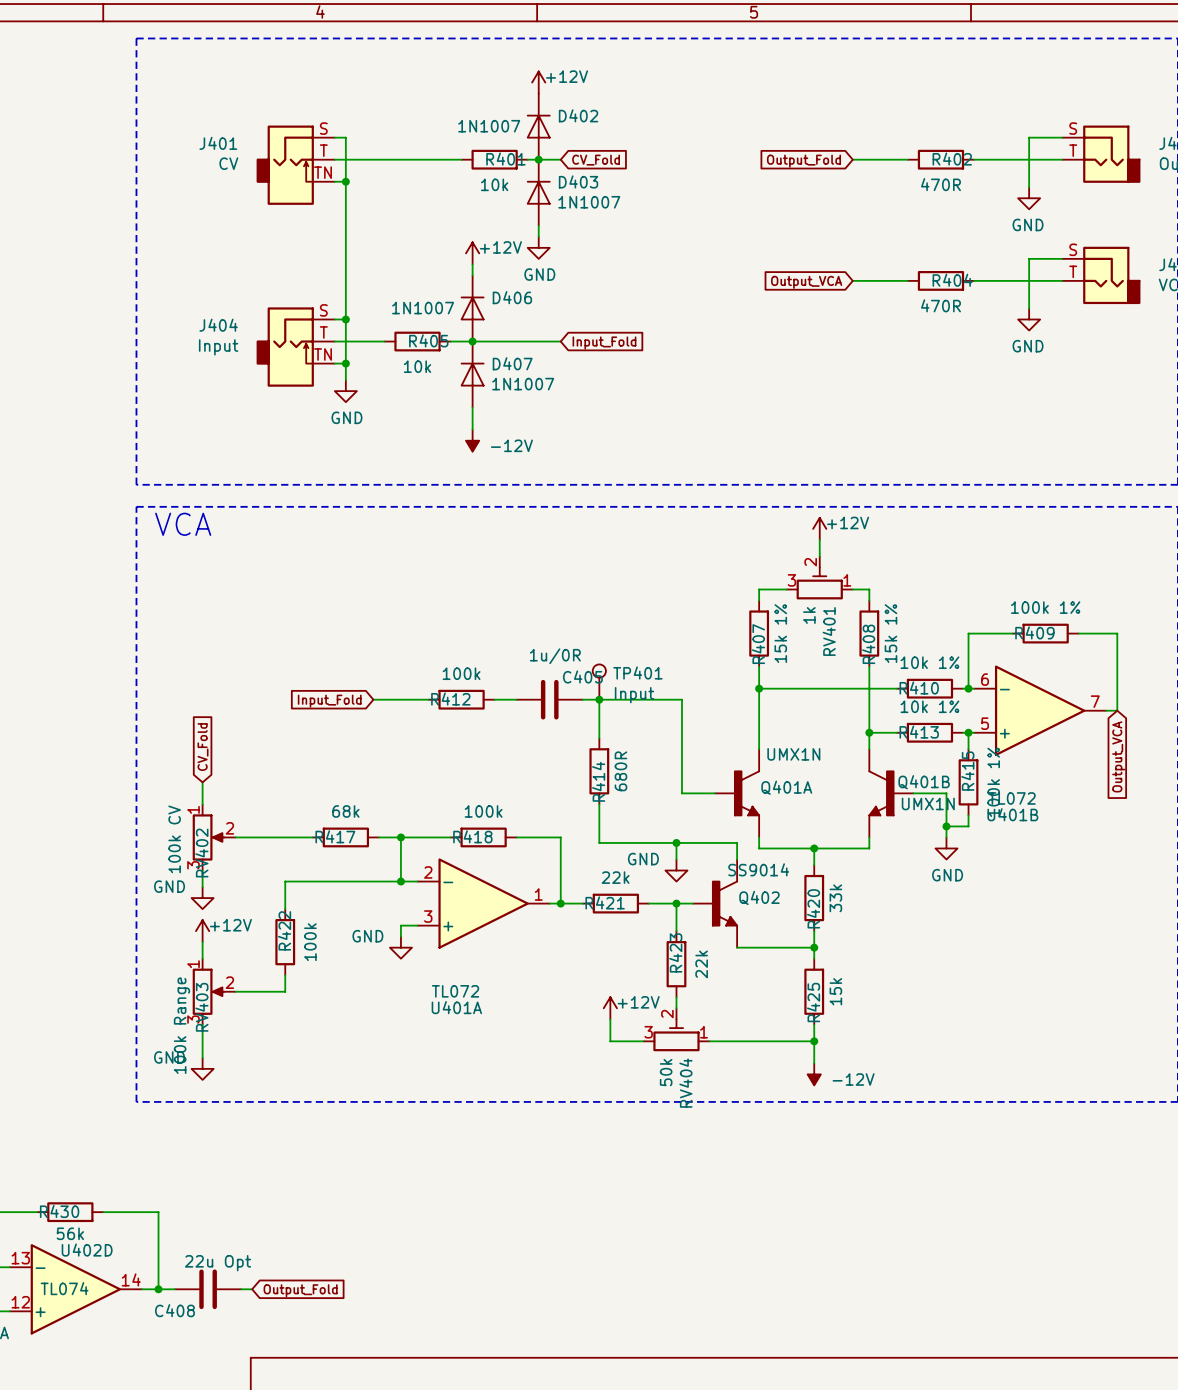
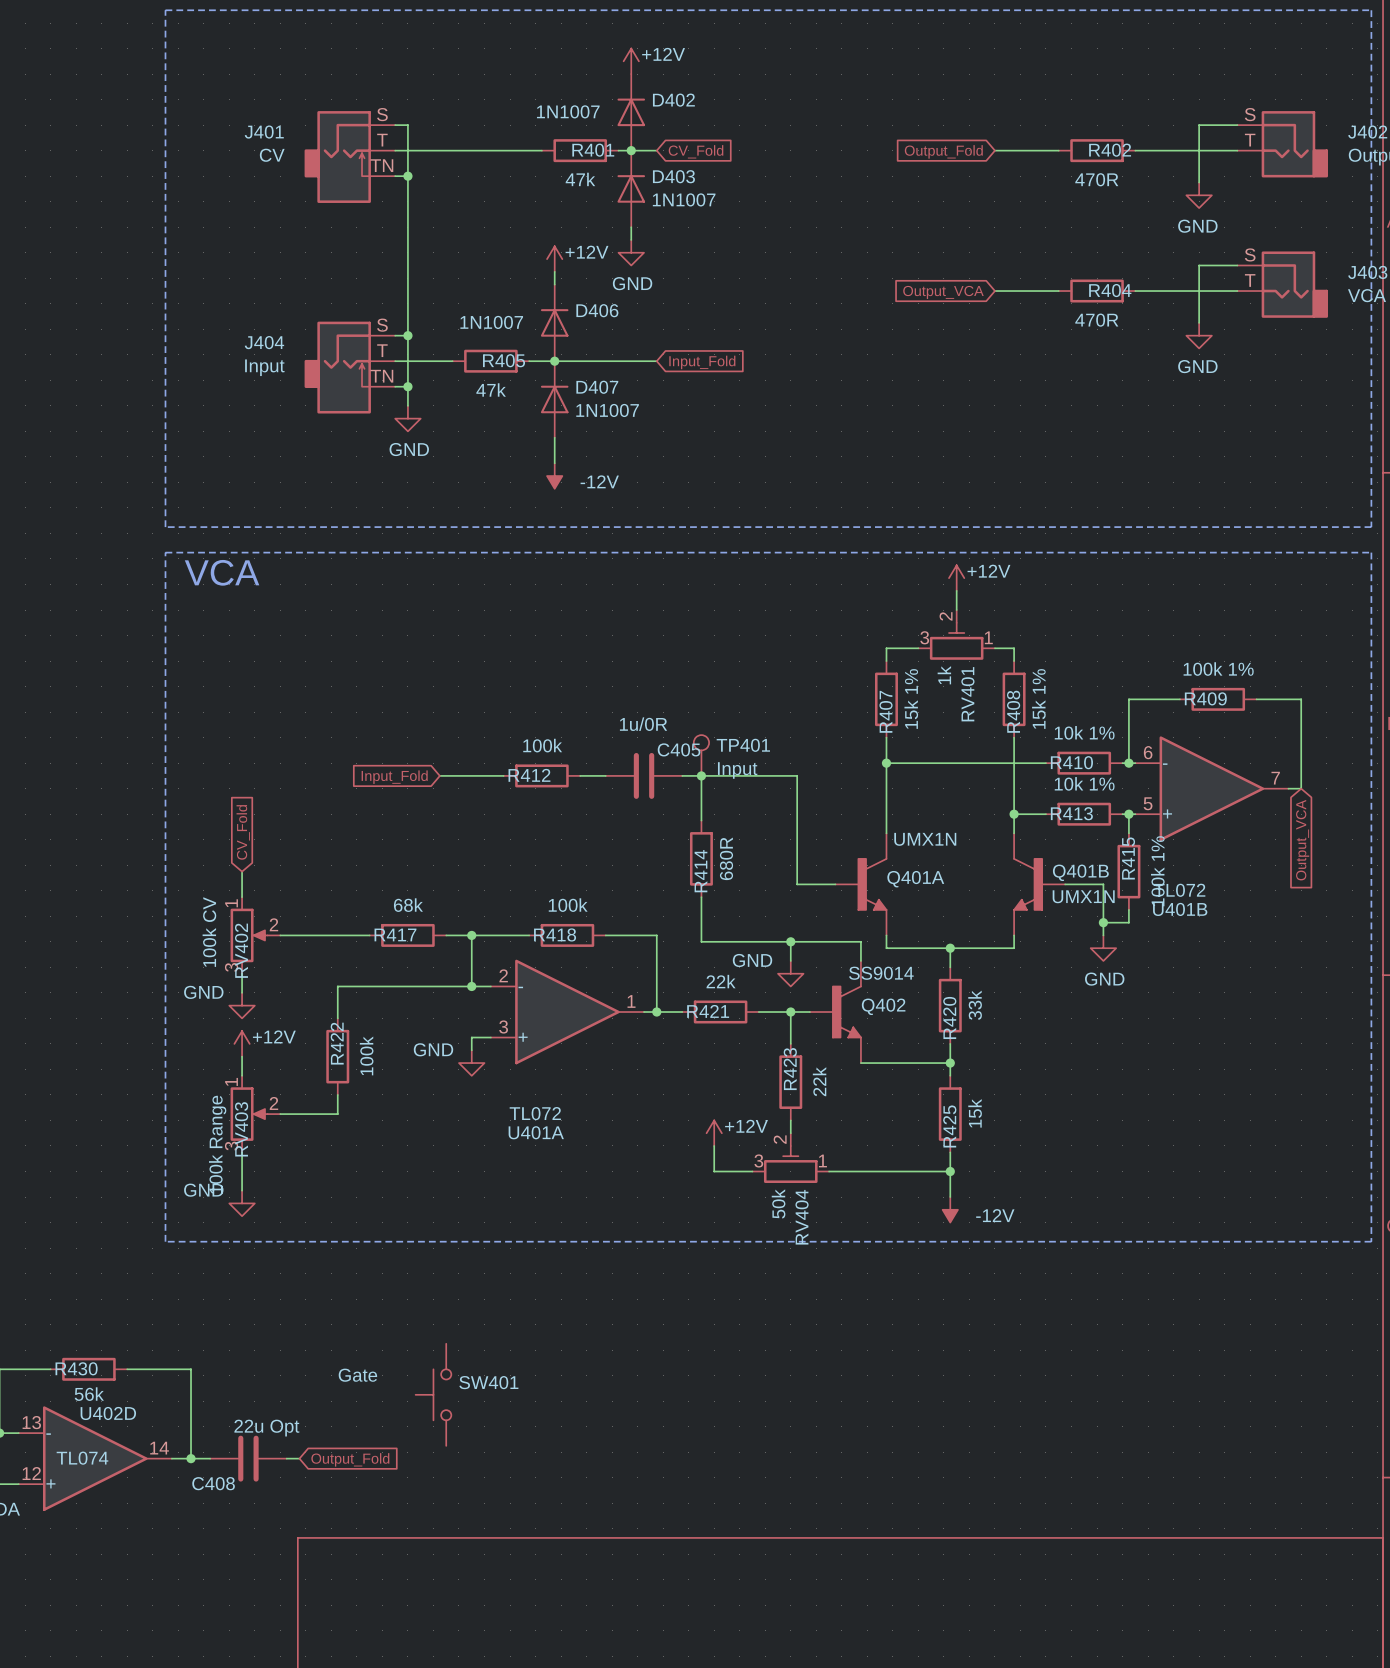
R401 value: 10k (494, 184) -> 47k (580, 179)
R405 value: 10k (417, 366) -> 47k (491, 389)
SW401: none -> Gate (433, 1394)

